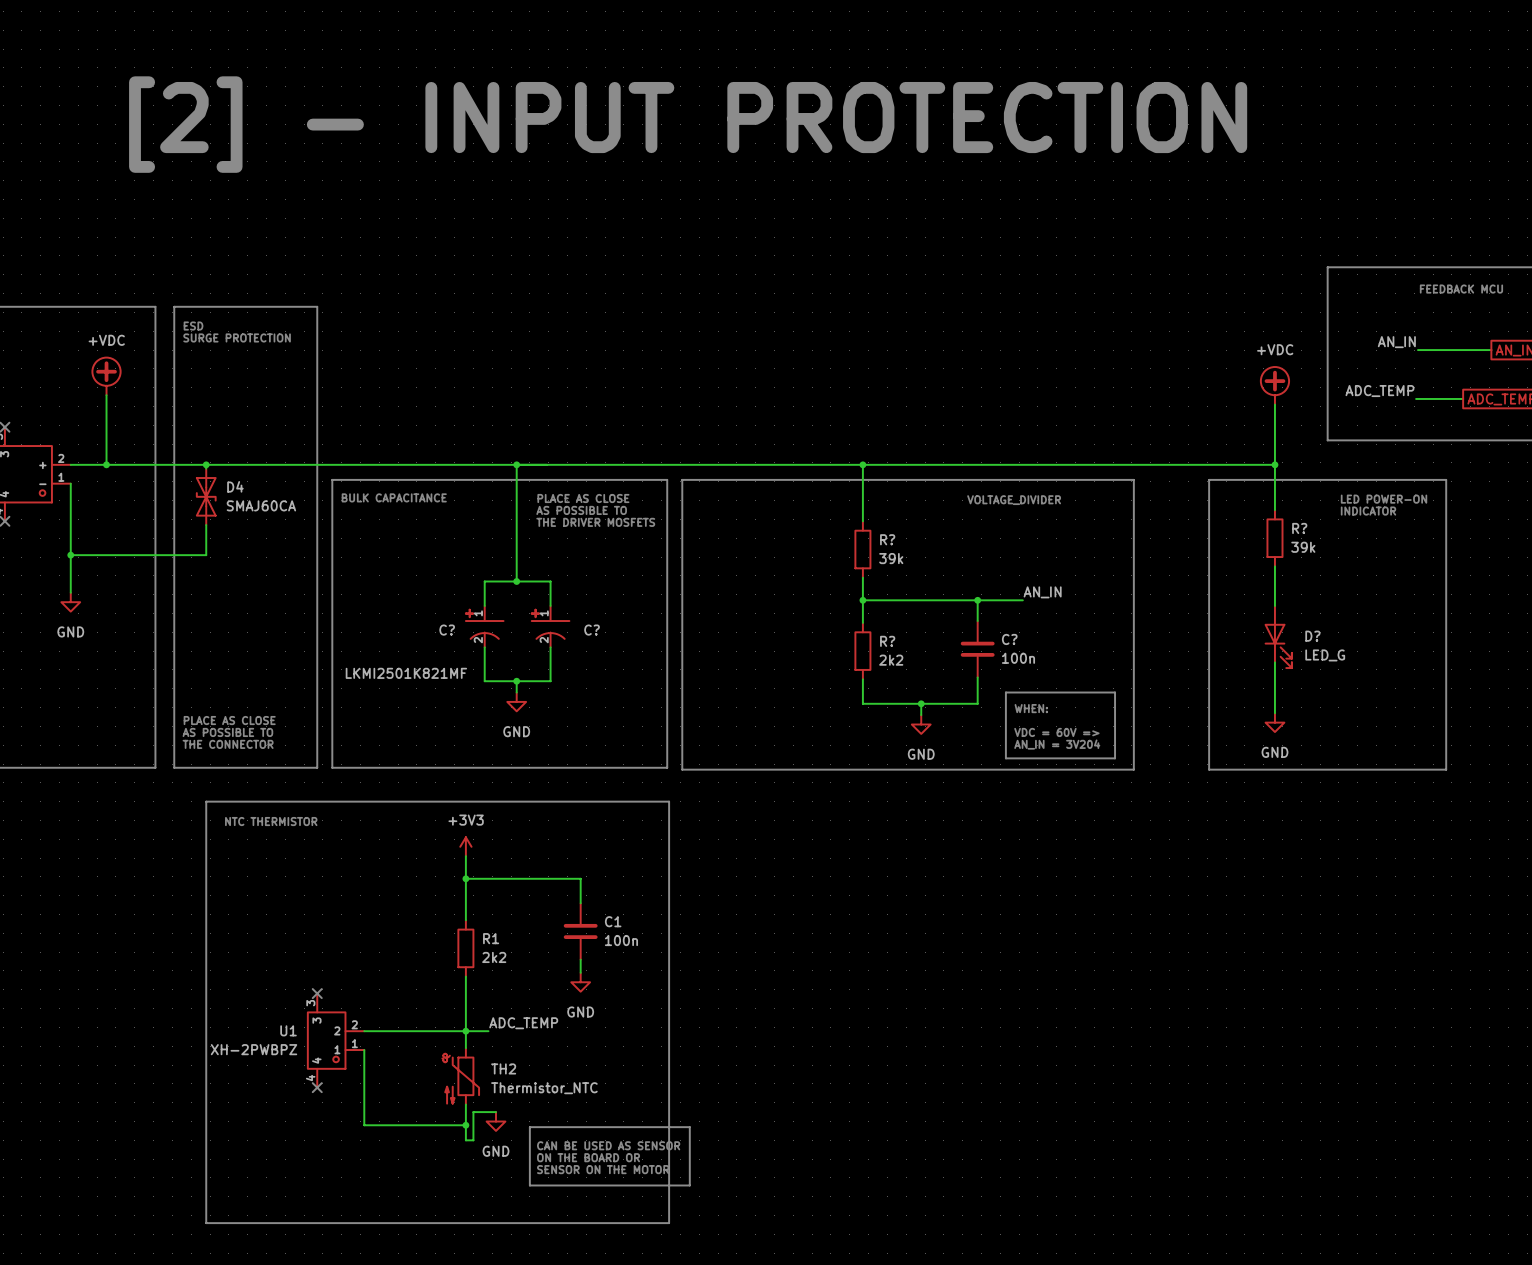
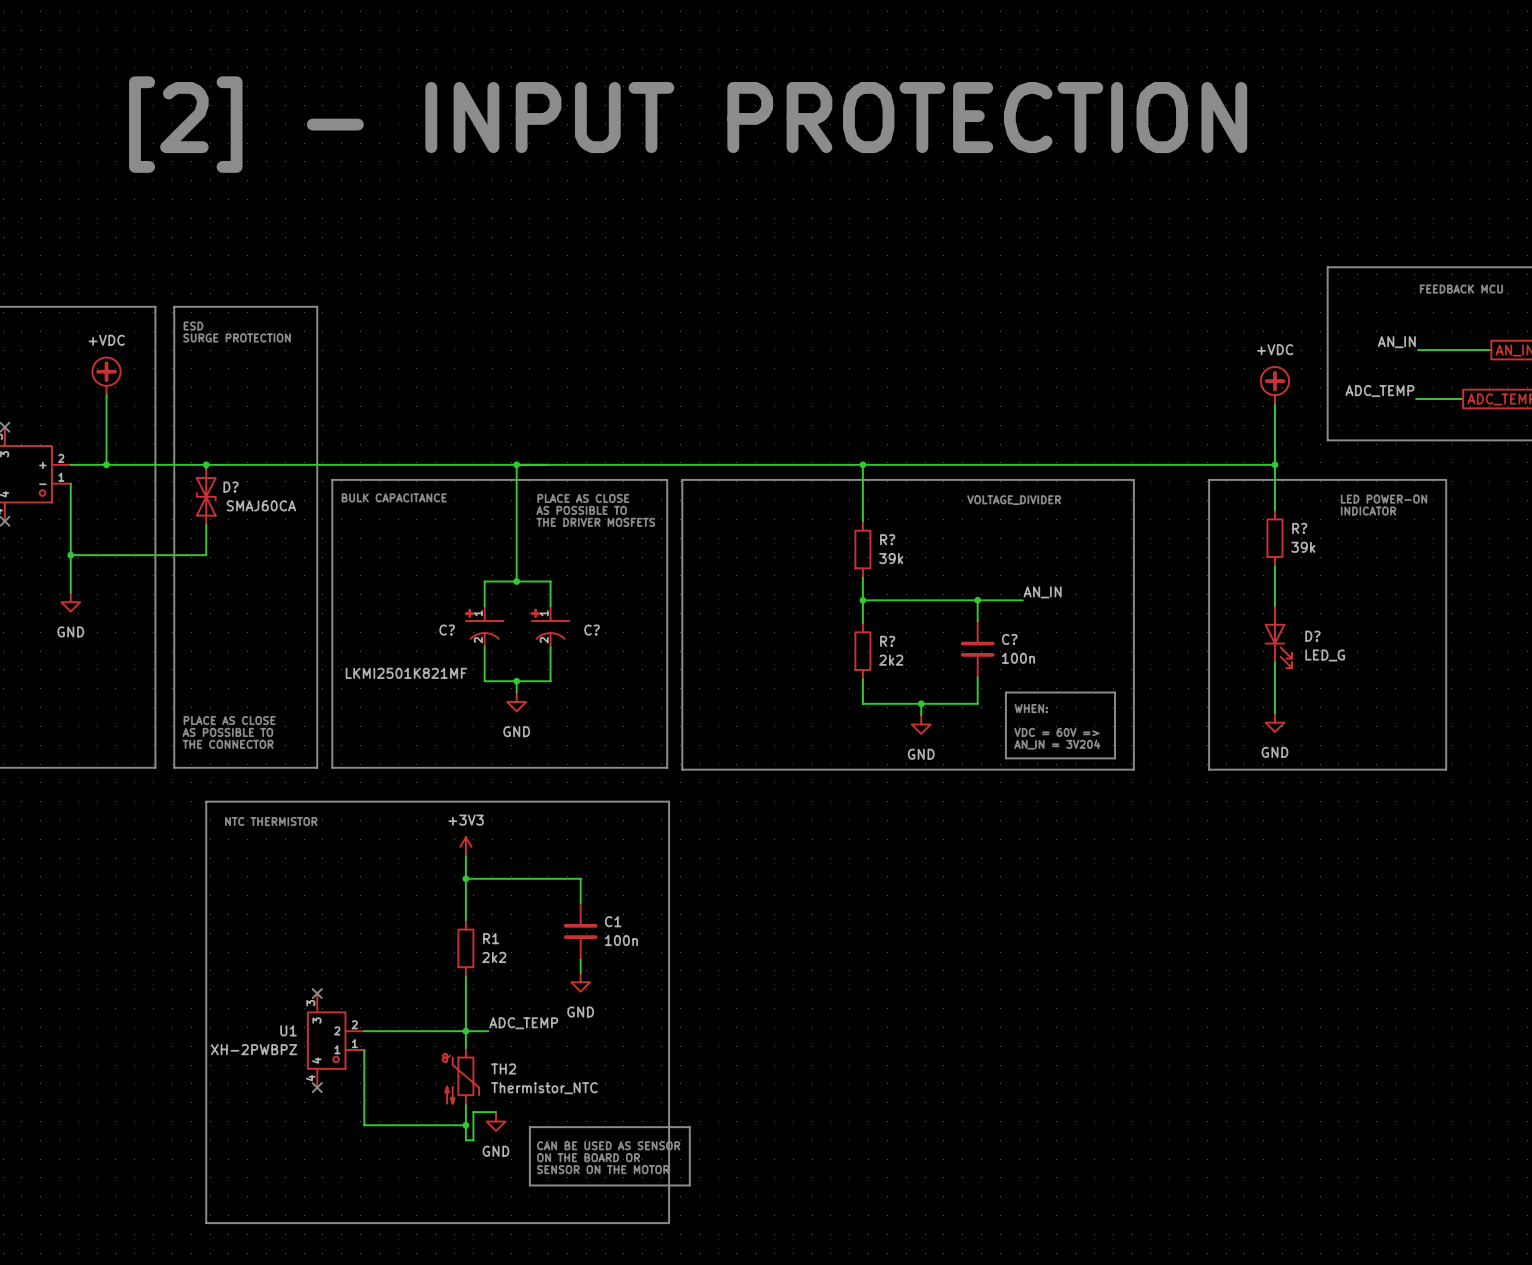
D4 name: D4 (235, 486) -> D? (230, 487)

